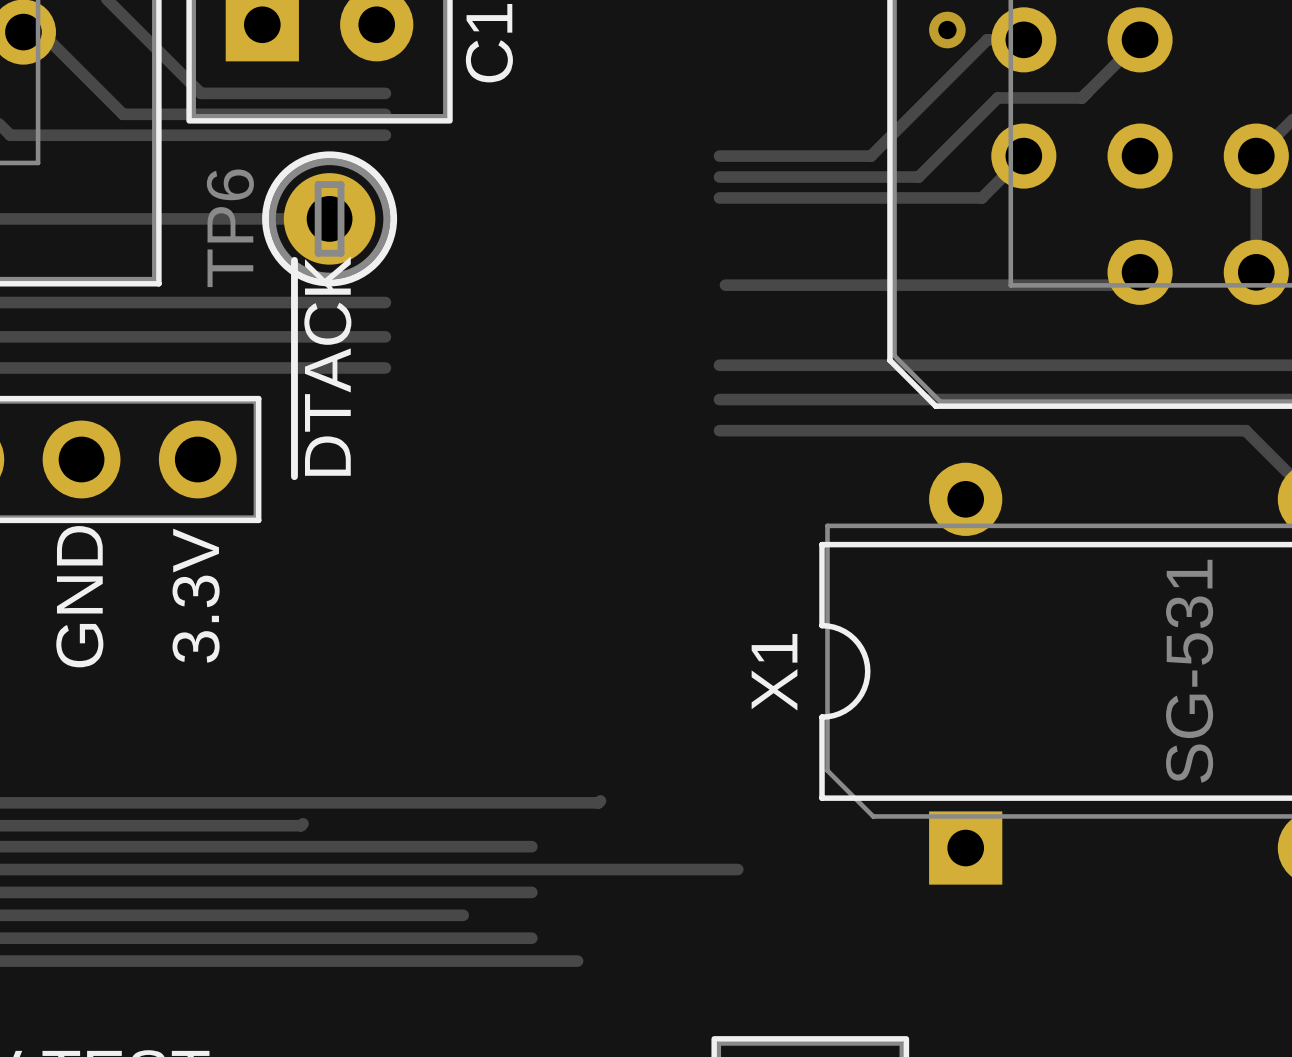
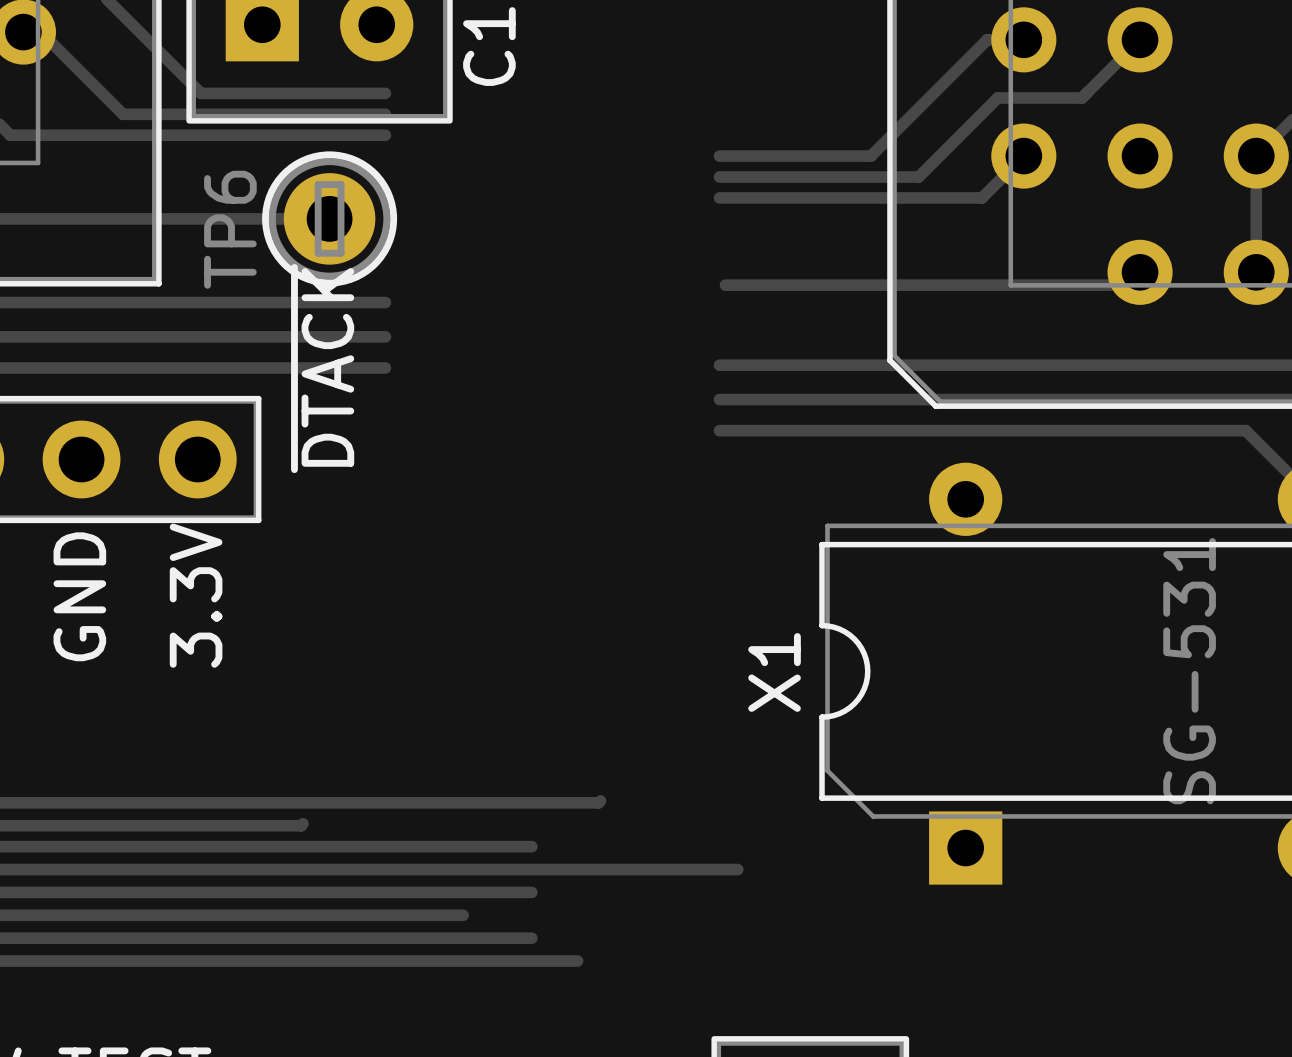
via: (947, 30) -> none

